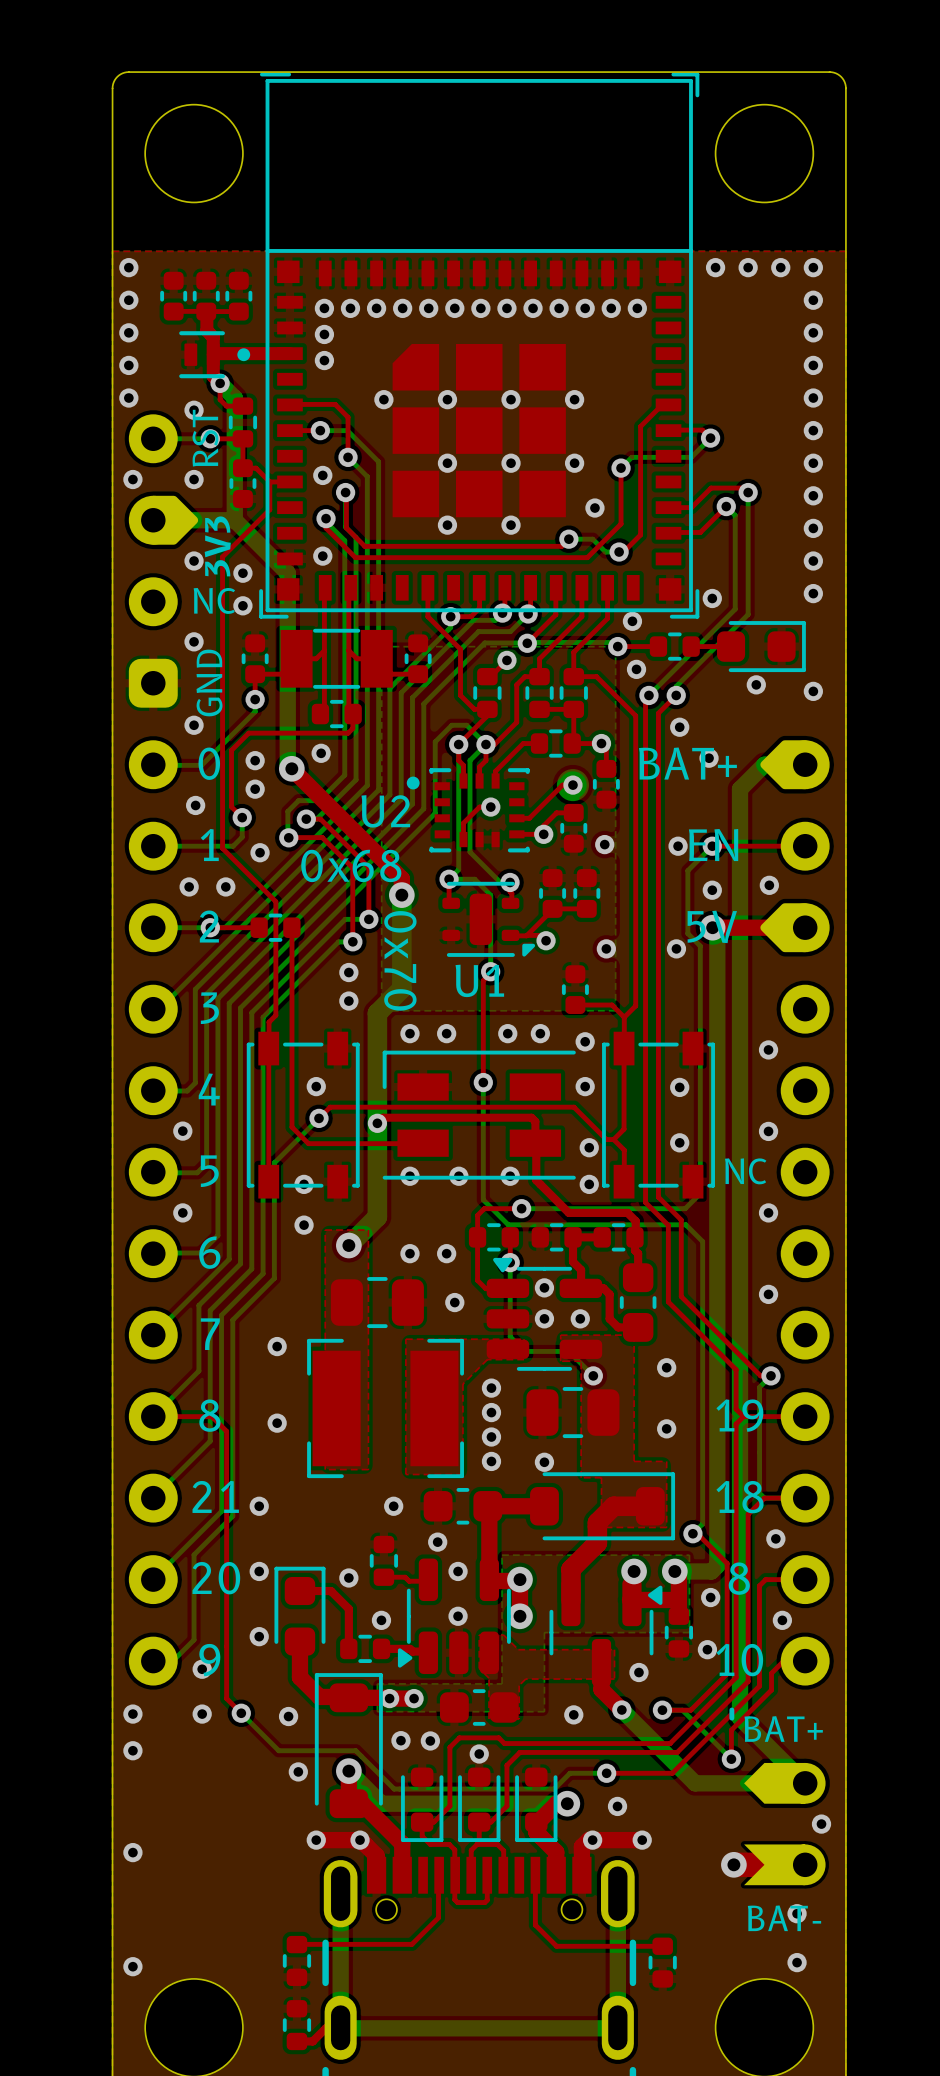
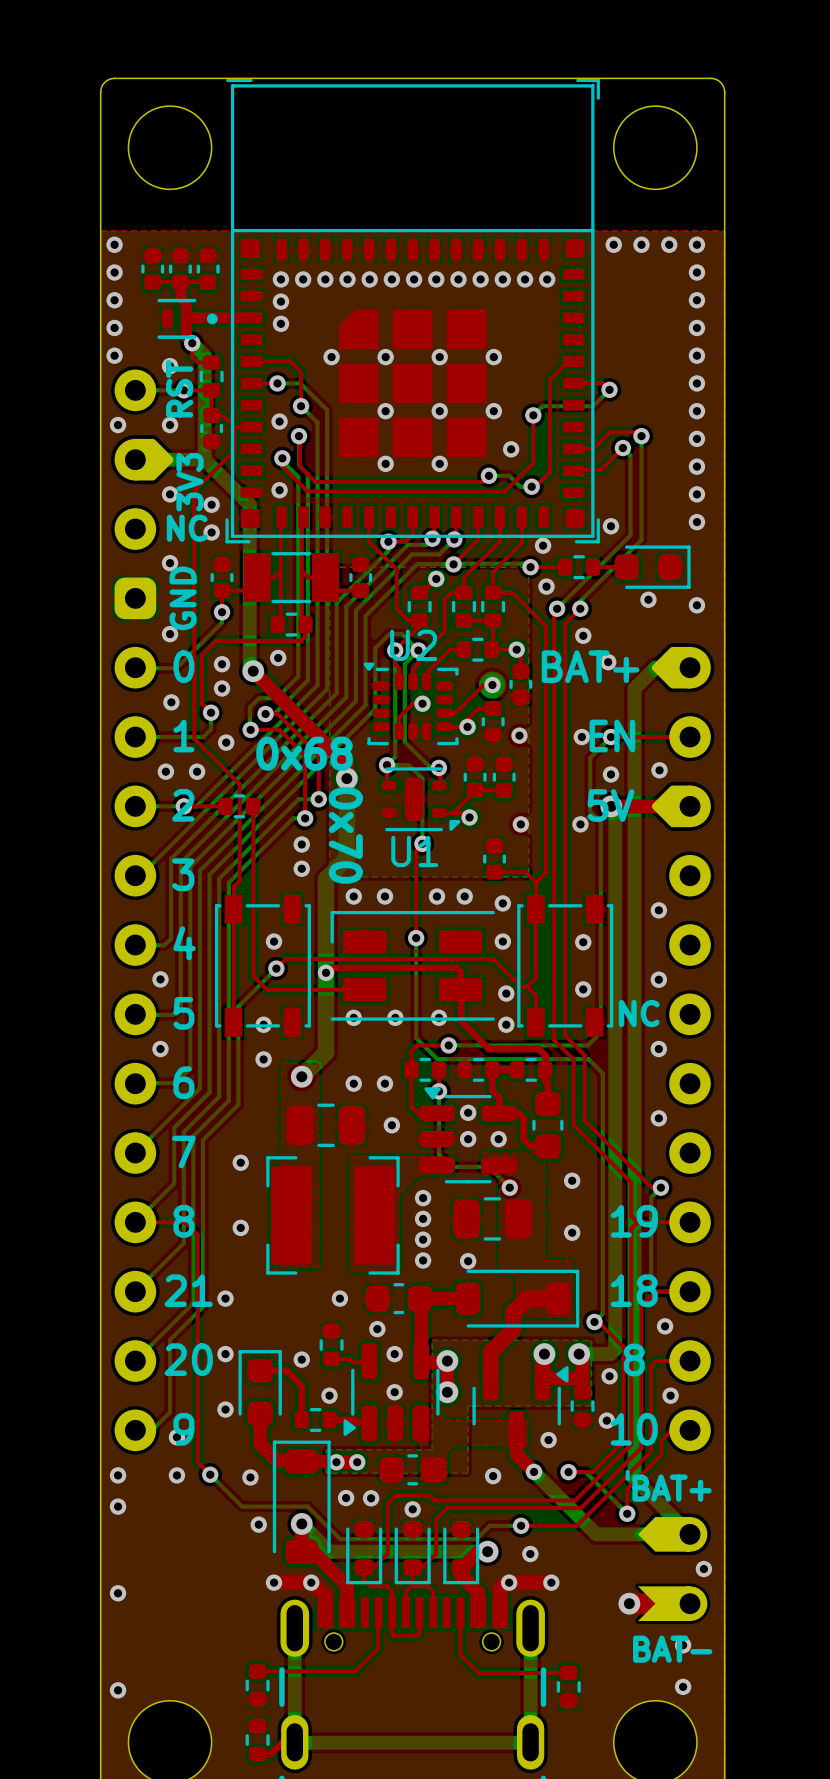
U2 footprint: [406, 768, 530, 853] -> [363, 662, 459, 746]
U2 name position: U2 (385, 811) -> U2 (413, 645)

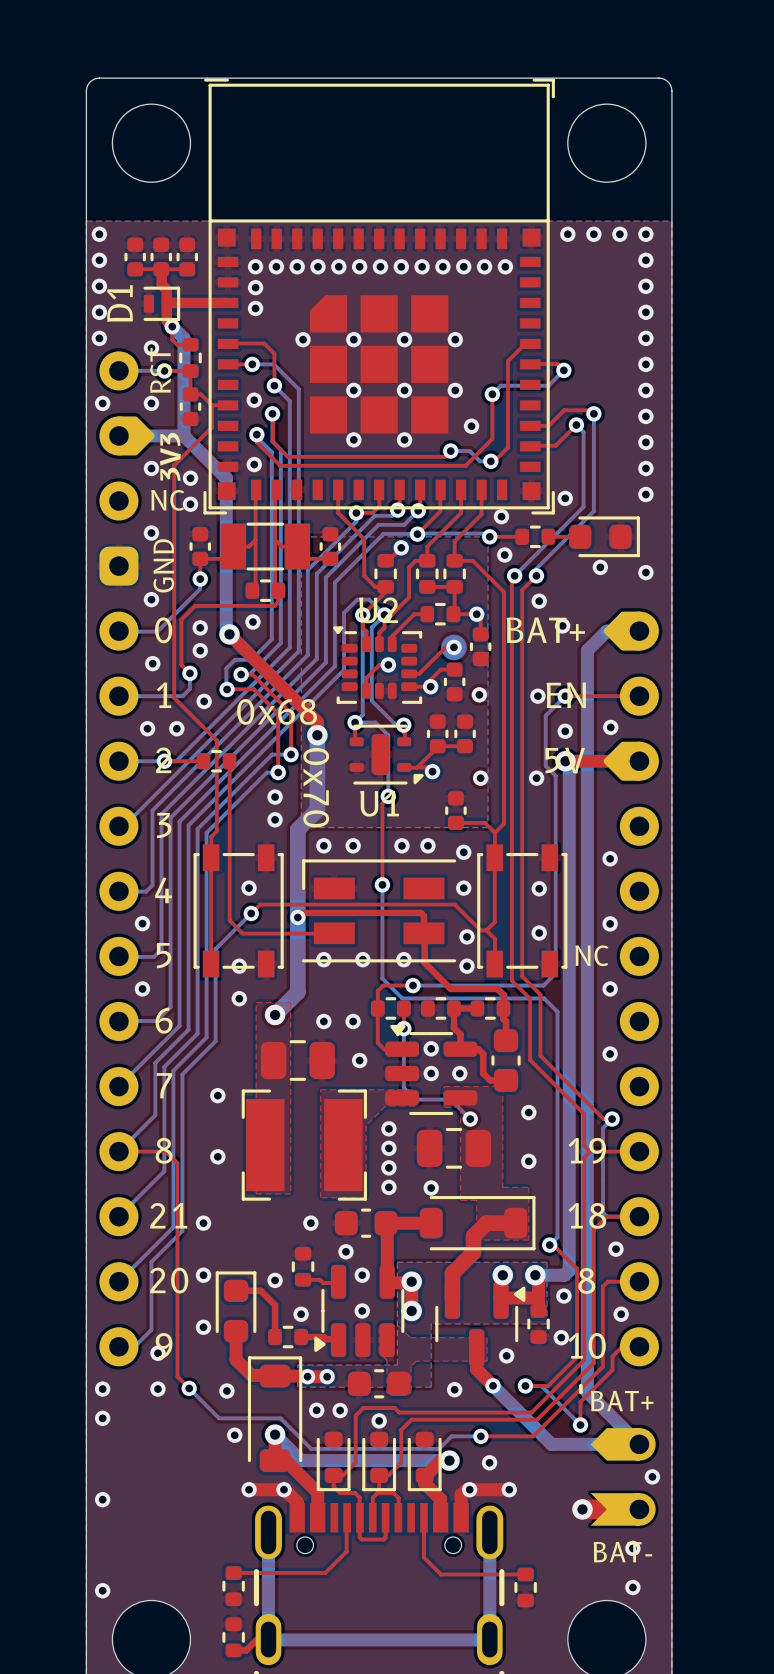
D1: none -> (161, 303)
part: (187, 318) -> none

